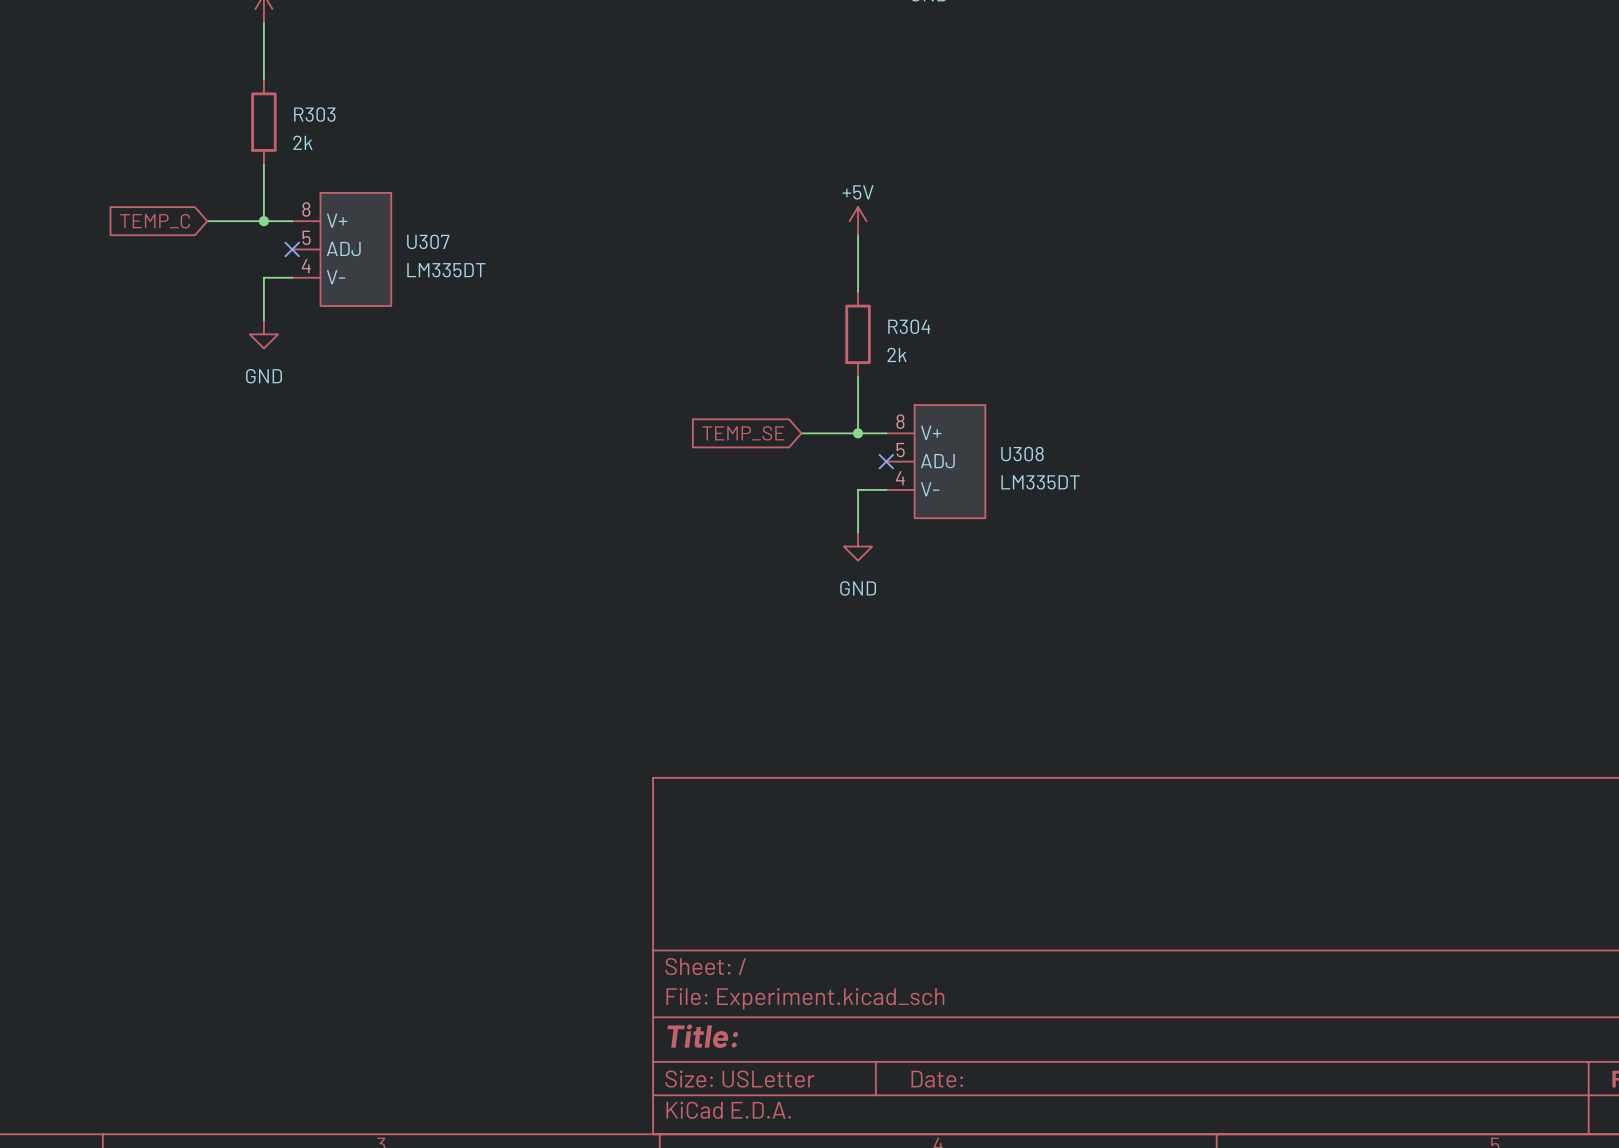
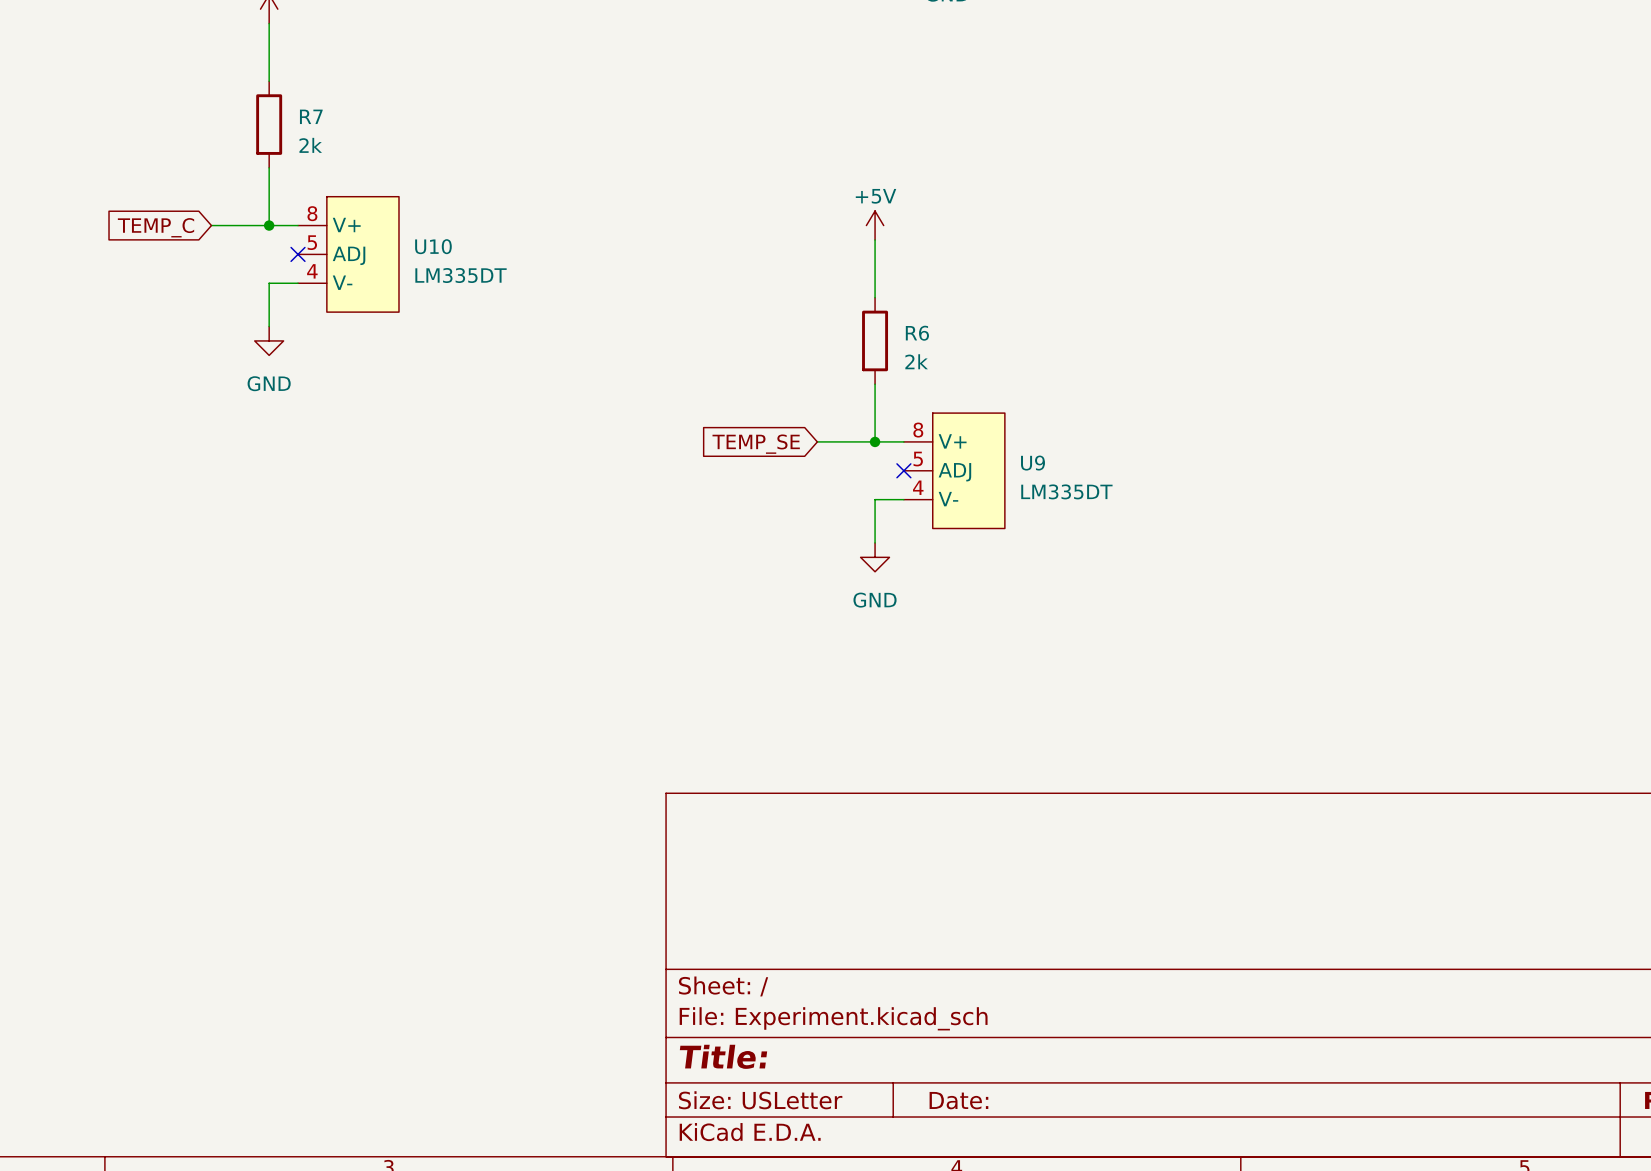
R303 name: R303 (314, 114) -> R7 (311, 116)
U307 name: U307 (428, 241) -> U10 (433, 246)
R304 name: R304 (909, 326) -> R6 (917, 333)
U308 name: U308 (1022, 454) -> U9 (1033, 463)

